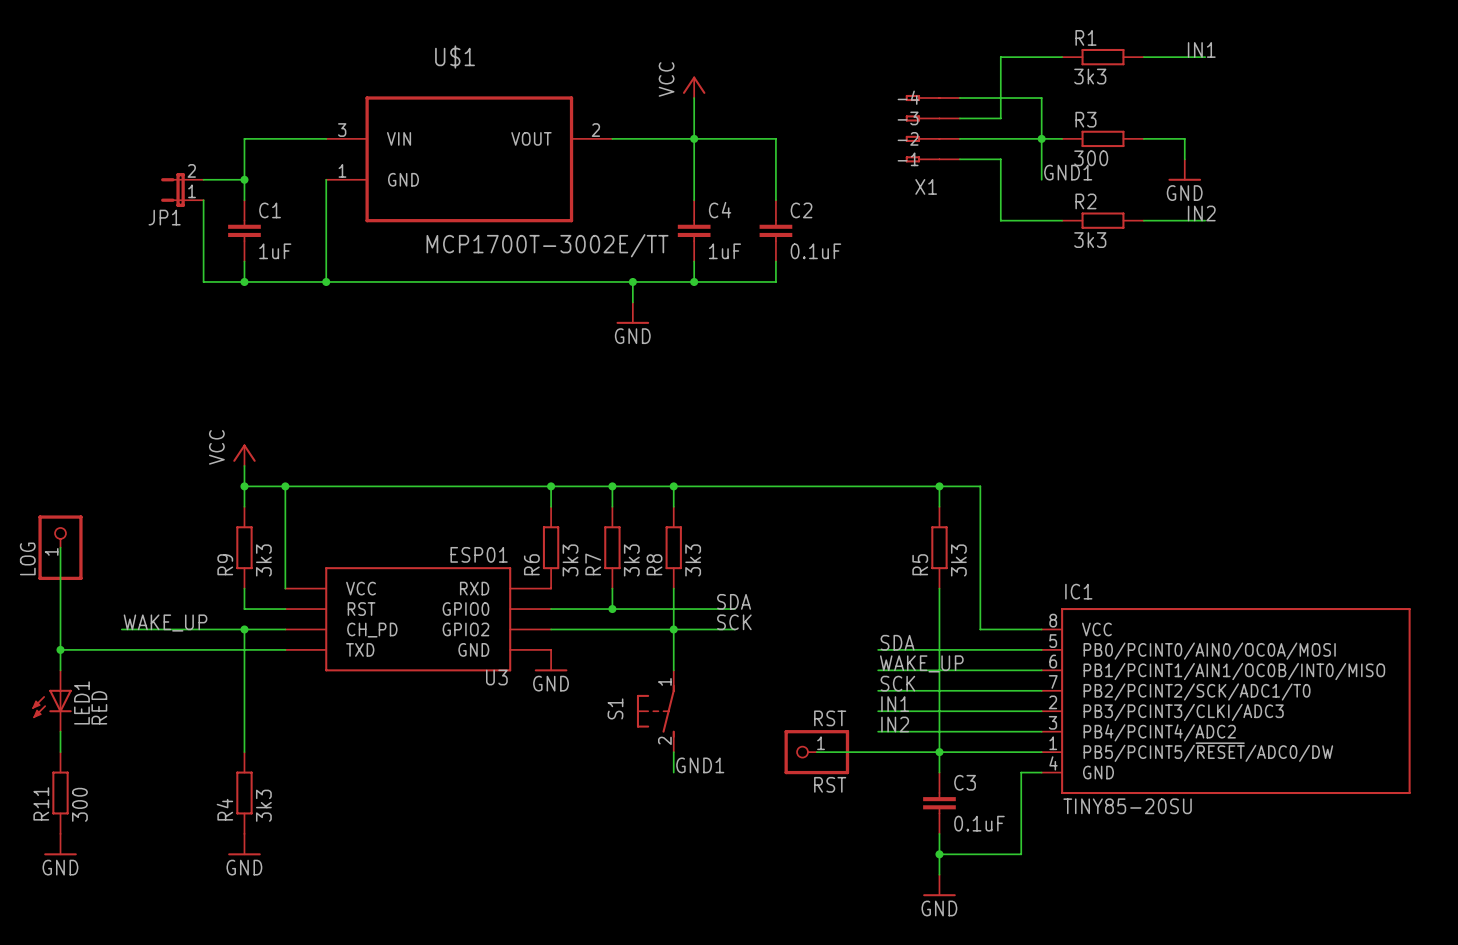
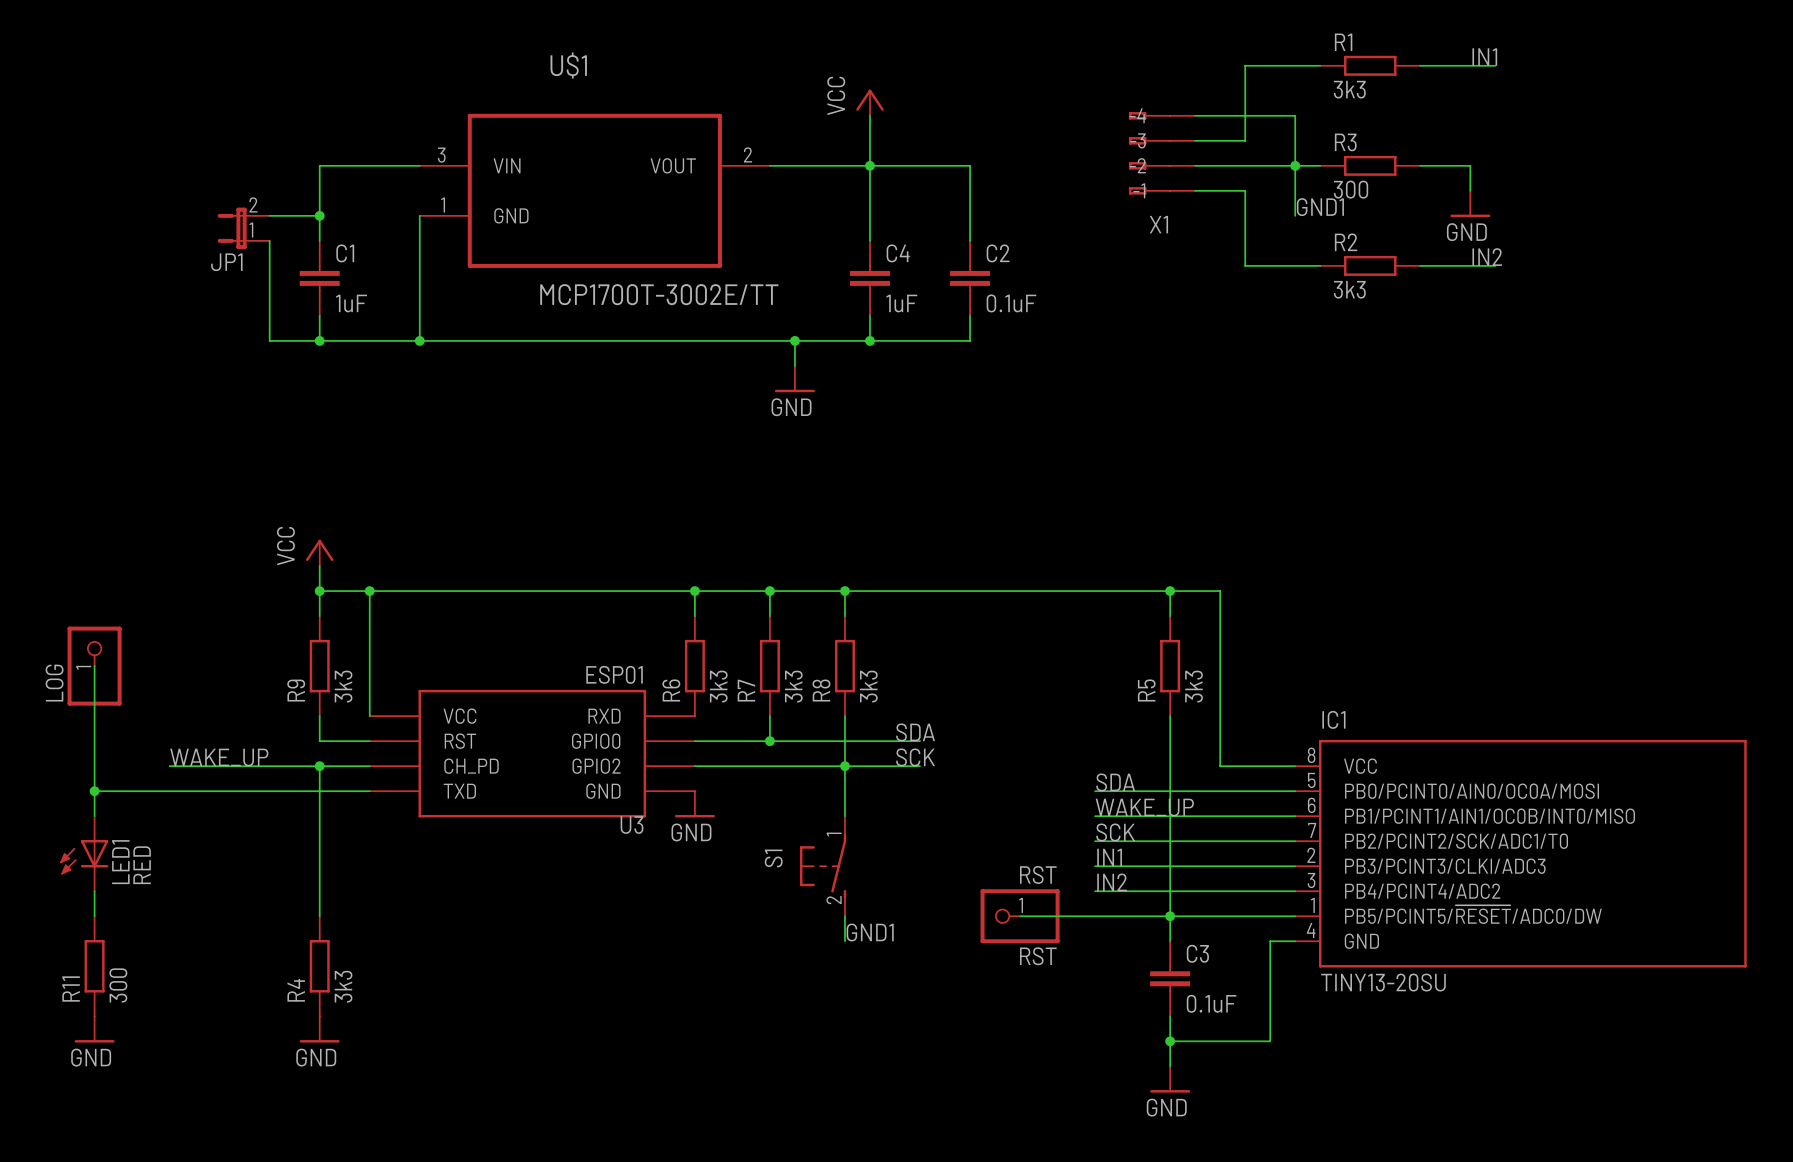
IC1 value: TINY85-20SU (1127, 806) -> TINY13-20SU (1383, 982)

